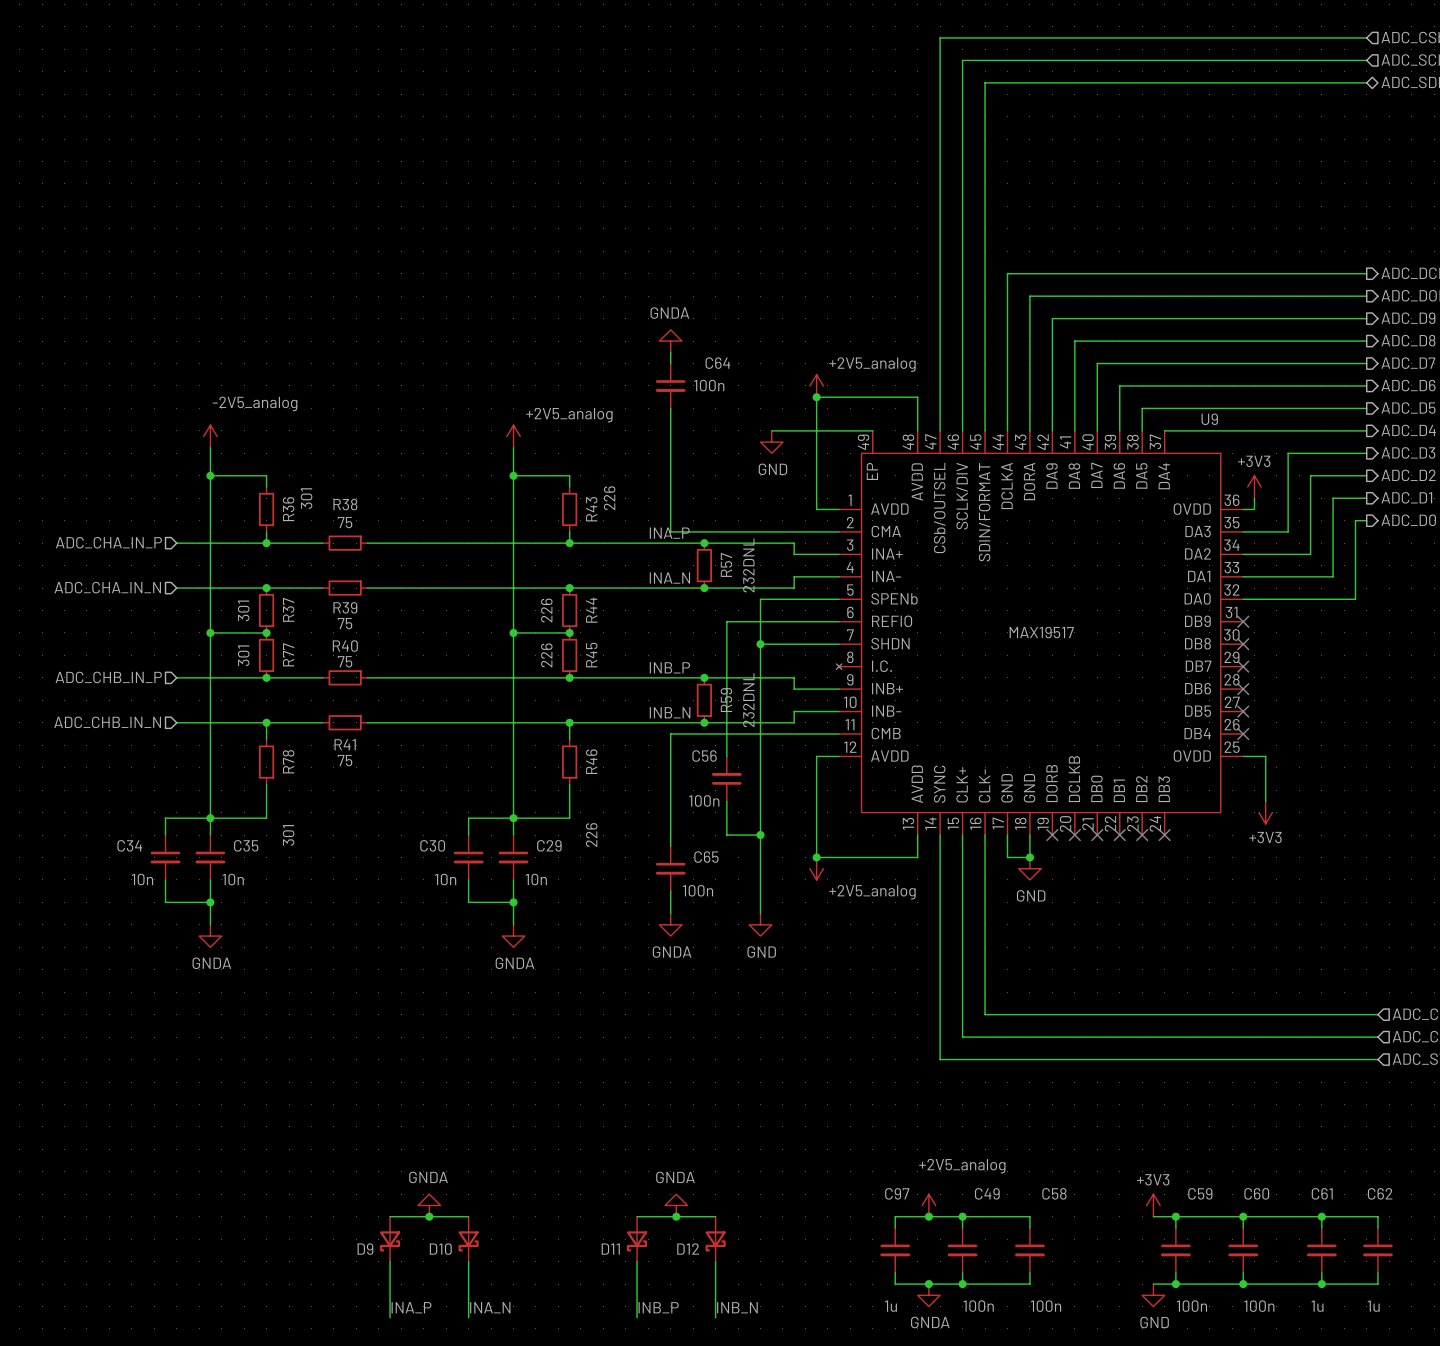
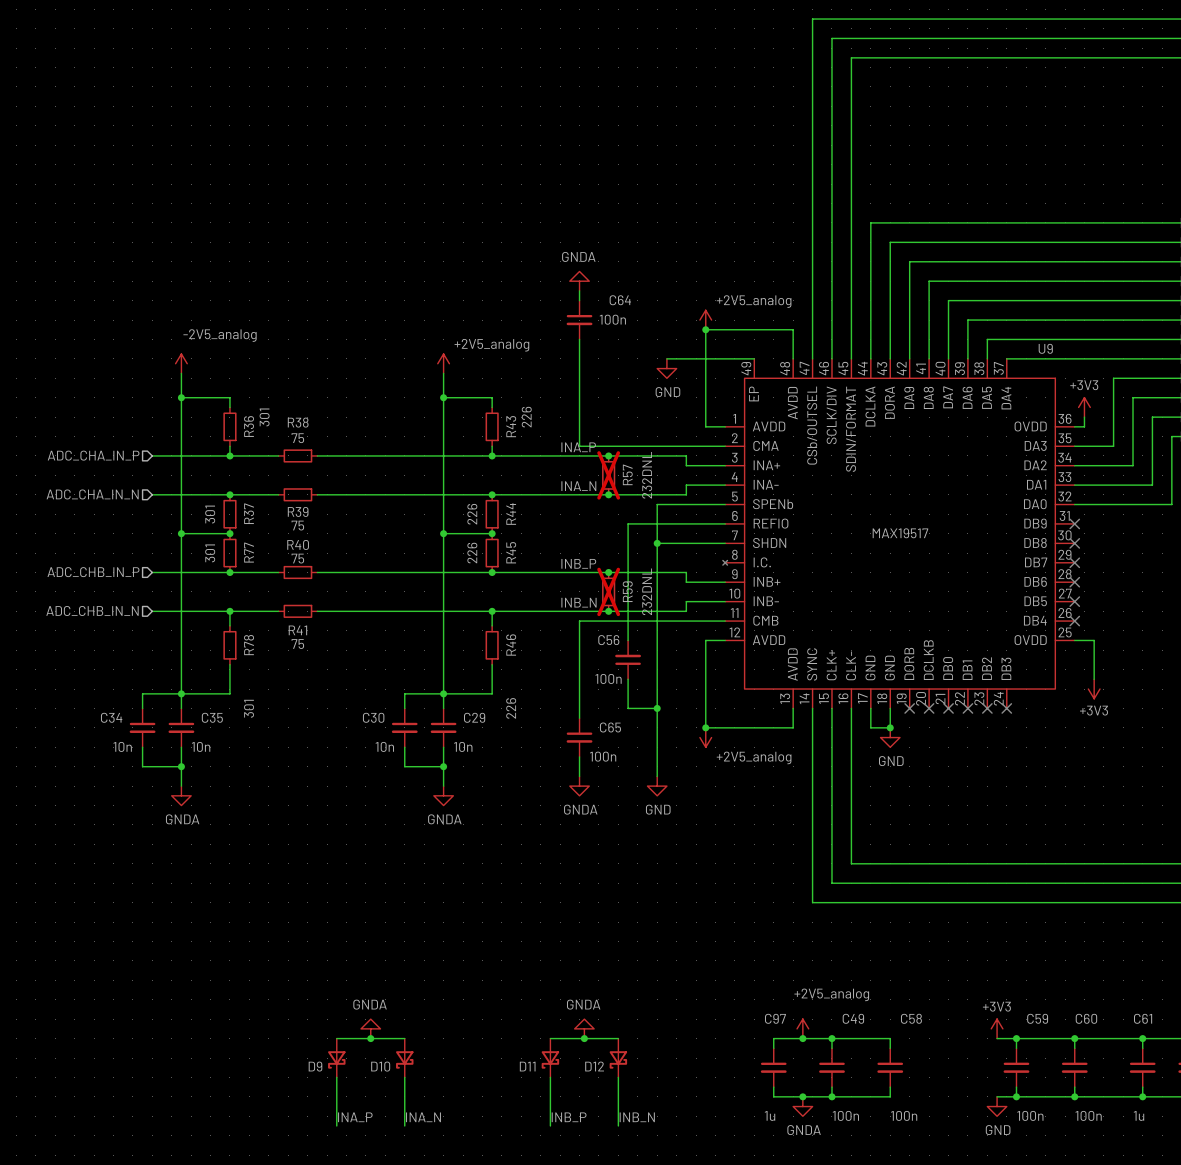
R57 do-not-place cross: none -> (608, 475)
R59 do-not-place cross: none -> (608, 591)

